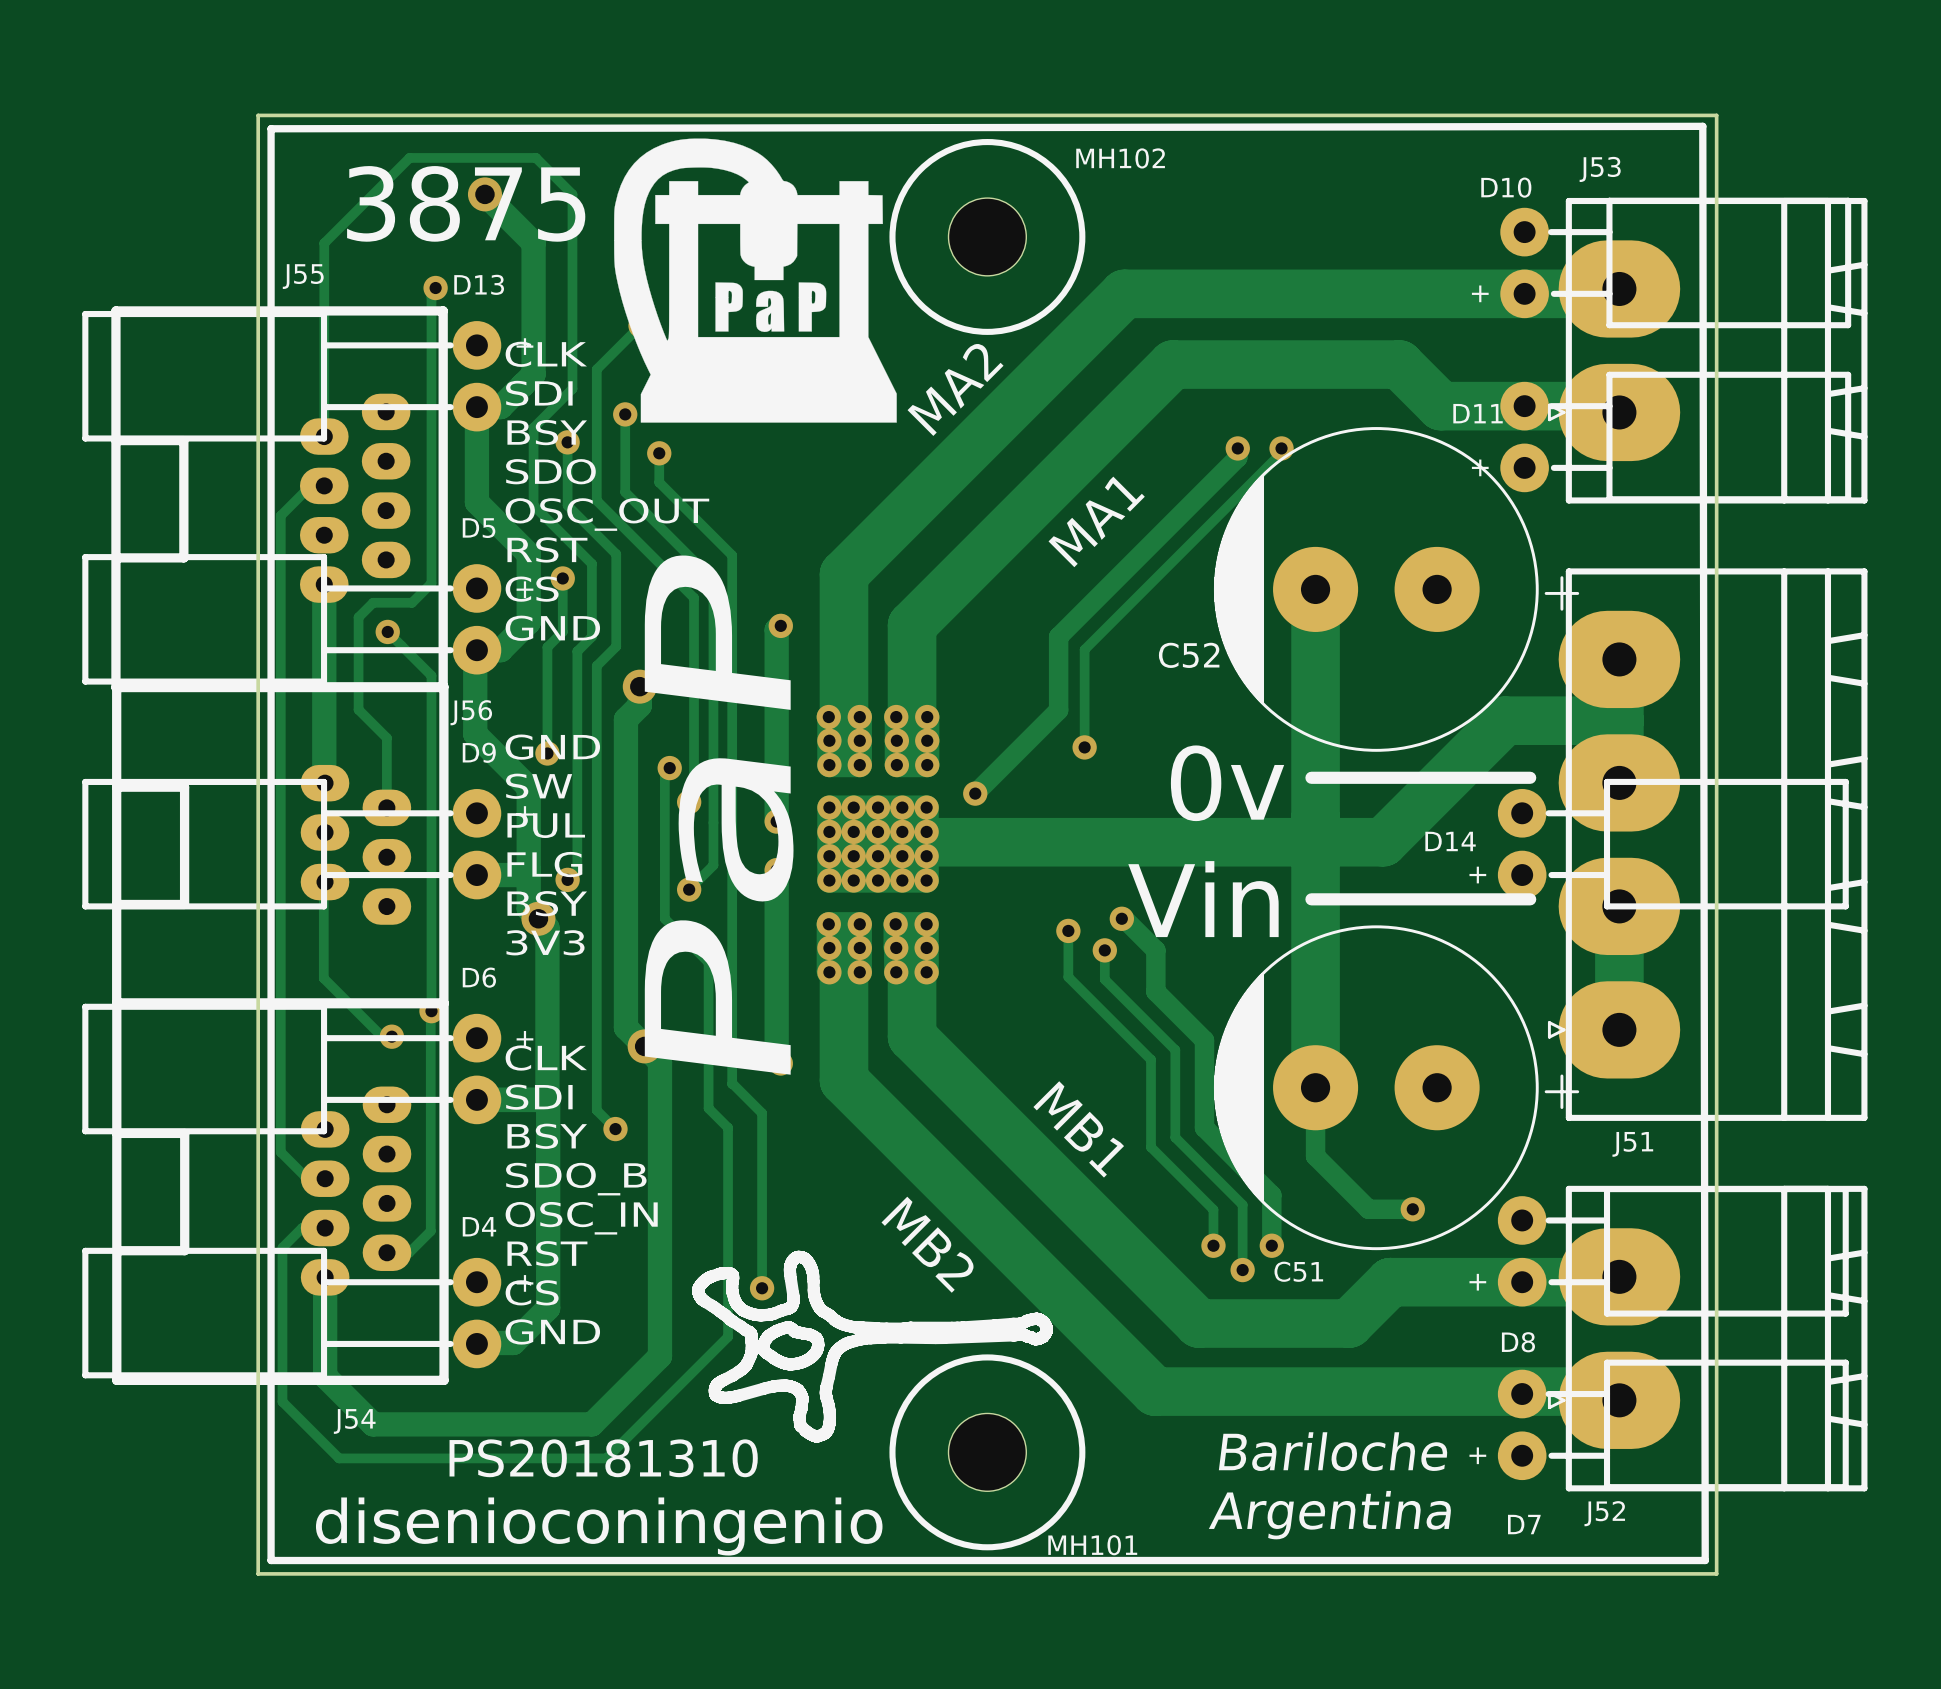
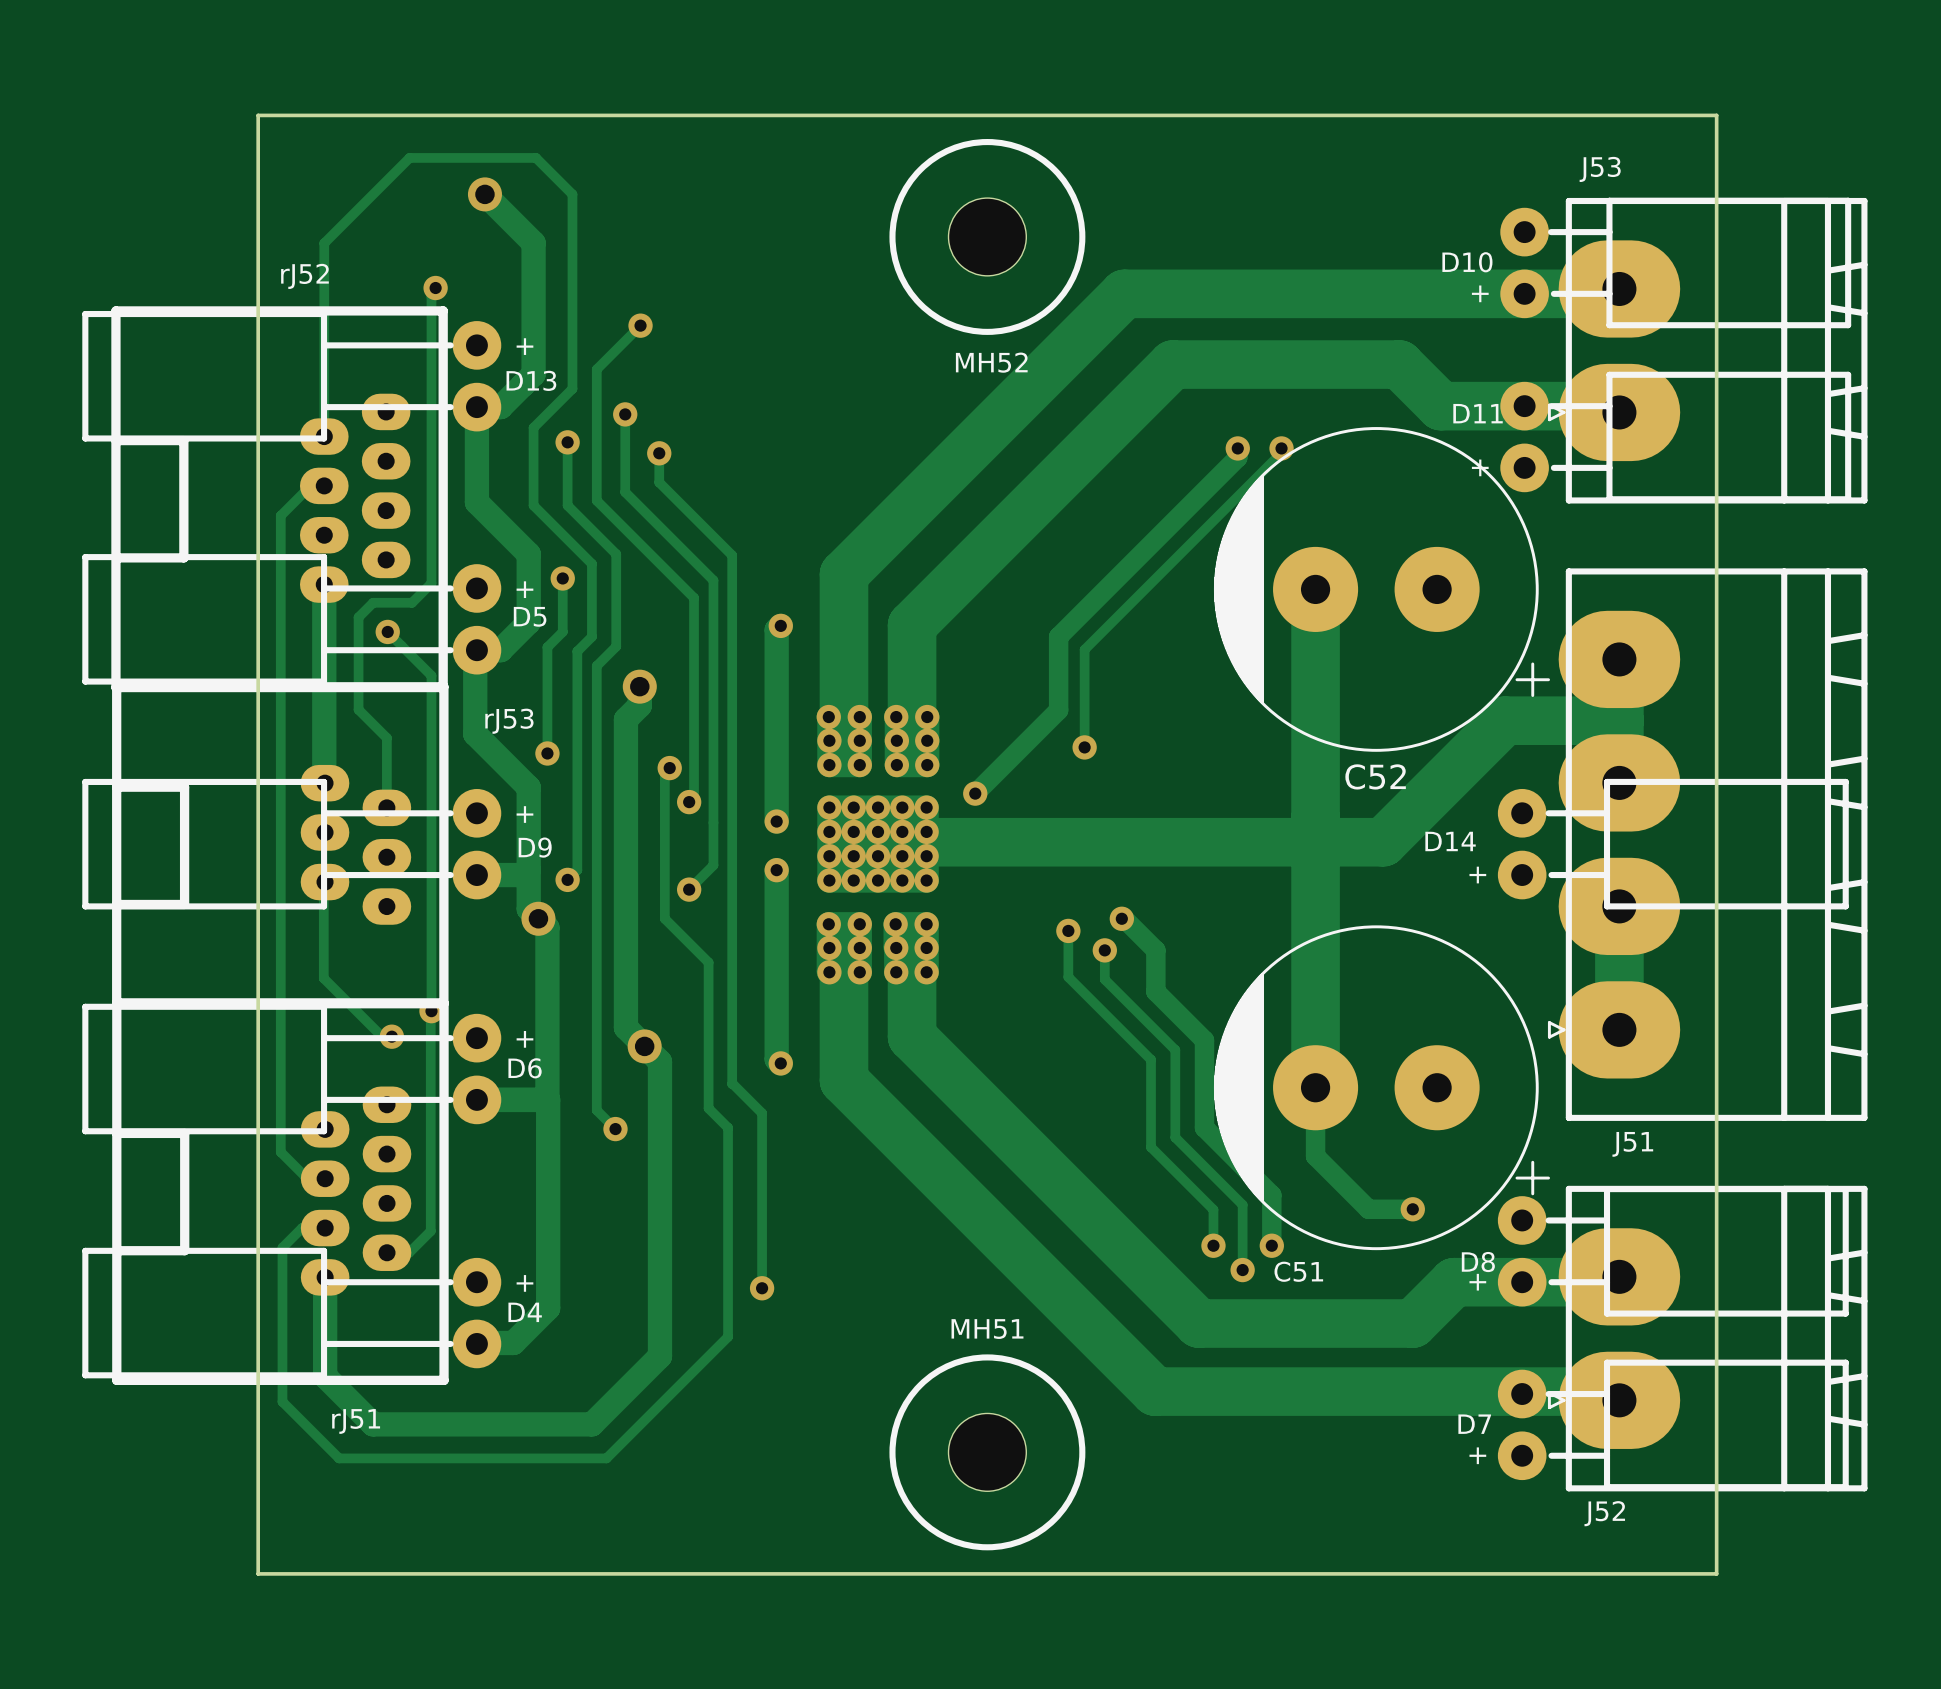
line: (1702, 126) (1705, 1560) (271, 1560) (271, 128) (1702, 126) -> none
drawing: [614, 138, 897, 423] -> none
MH102 name: MH102 (1120, 158) -> MH52 (991, 362)
D10 name position: D10 (1506, 187) -> D10 (1467, 262)
text: 3875 (466, 203) -> none
J55 name: J55 (303, 276) -> rJ52 (304, 276)
D13 name position: D13 (479, 284) -> D13 (531, 380)
text: CLK (546, 354) -> none
text: MA2 (955, 389) -> none
text: SDI (539, 393) -> none
C52 footprint: [1213, 427, 1580, 752] -> [1213, 427, 1551, 752]
text: BSY (547, 432) -> none
text: SDO (550, 471) -> none
text: OSC_OUT (607, 514) -> none
text: MA1 (1096, 521) -> none
D5 name position: D5 (479, 528) -> D5 (530, 616)
text: RST (547, 549) -> none
text: CS (532, 589) -> none
text: GND (552, 628) -> none
C52 name position: C52 (1189, 655) -> C52 (1375, 776)
J56 name: J56 (471, 712) -> rJ53 (509, 721)
text: GND (552, 747) -> none
D9 name position: D9 (479, 752) -> D9 (535, 847)
line: (1311, 777) (1530, 777) -> none
text: 0v (1227, 783) -> none
text: SW (539, 786) -> none
text: PaP (719, 813) -> none
text: PUL (546, 825) -> none
text: FLG (544, 864) -> none
text: Vin (1203, 899) -> none
line: (1311, 899) (1530, 899) -> none
text: BSY (547, 903) -> none
C51 footprint: [1213, 925, 1580, 1251] -> [1213, 925, 1551, 1251]
text: 3V3 (545, 942) -> none
D6 name position: D6 (479, 977) -> D6 (525, 1068)
text: CLK (546, 1058) -> none
text: SDI (539, 1097) -> none
text: MB1 (1078, 1129) -> none
text: BSY (547, 1136) -> none
text: SDO_B (576, 1179) -> none
text: OSC_IN (581, 1218) -> none
D4 name position: D4 (479, 1226) -> D4 (525, 1312)
text: MB2 (927, 1244) -> none
drawing: [692, 1250, 1053, 1443] -> none
text: RST (547, 1253) -> none
track: (1454, 1282) (1390, 1282) (1349, 1323) -> (1454, 1282) (1412, 1323) (1349, 1323)
text: CS (532, 1292) -> none
text: GND (552, 1331) -> none
D8 name position: D8 (1518, 1342) -> D8 (1478, 1262)
J54 name: J54 (354, 1421) -> rJ51 (356, 1421)
text: Bariloche (1333, 1451) -> none
text: PS20181310 (603, 1458) -> none
text: Argentina (1330, 1515) -> none
D7 name position: D7 (1524, 1524) -> D7 (1474, 1424)
text: disenioconingenio (599, 1526) -> none
MH101 name: MH101 (1092, 1545) -> MH51 (987, 1329)

